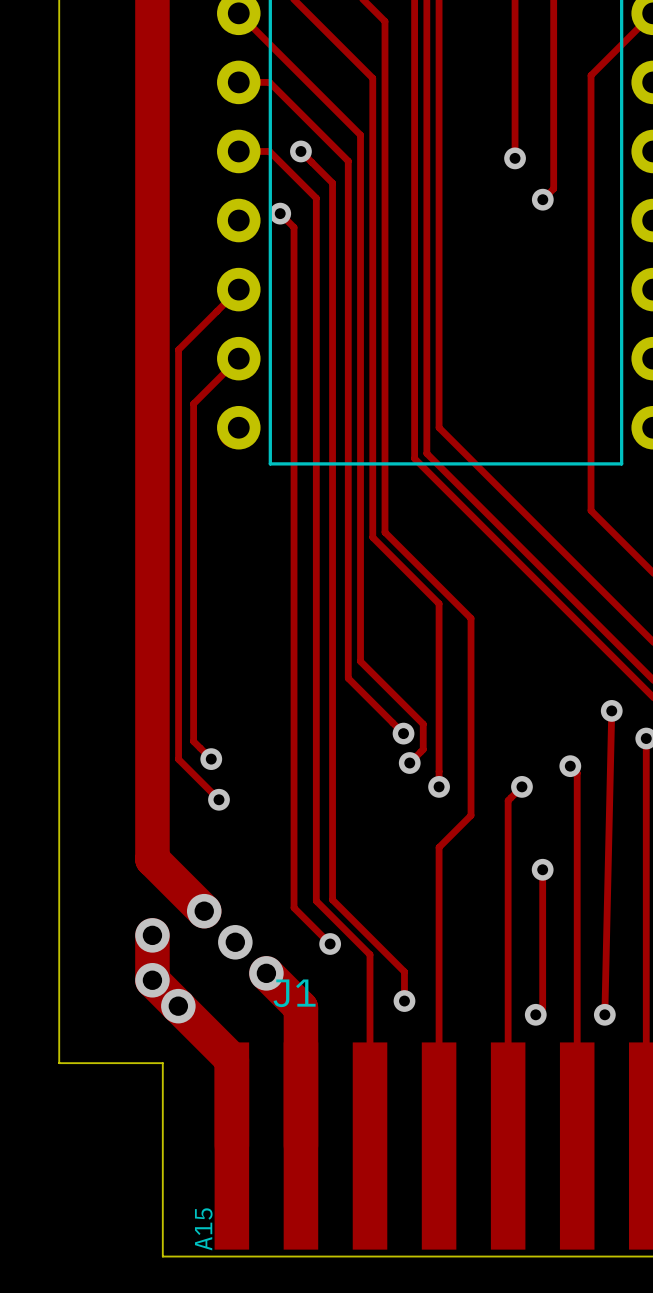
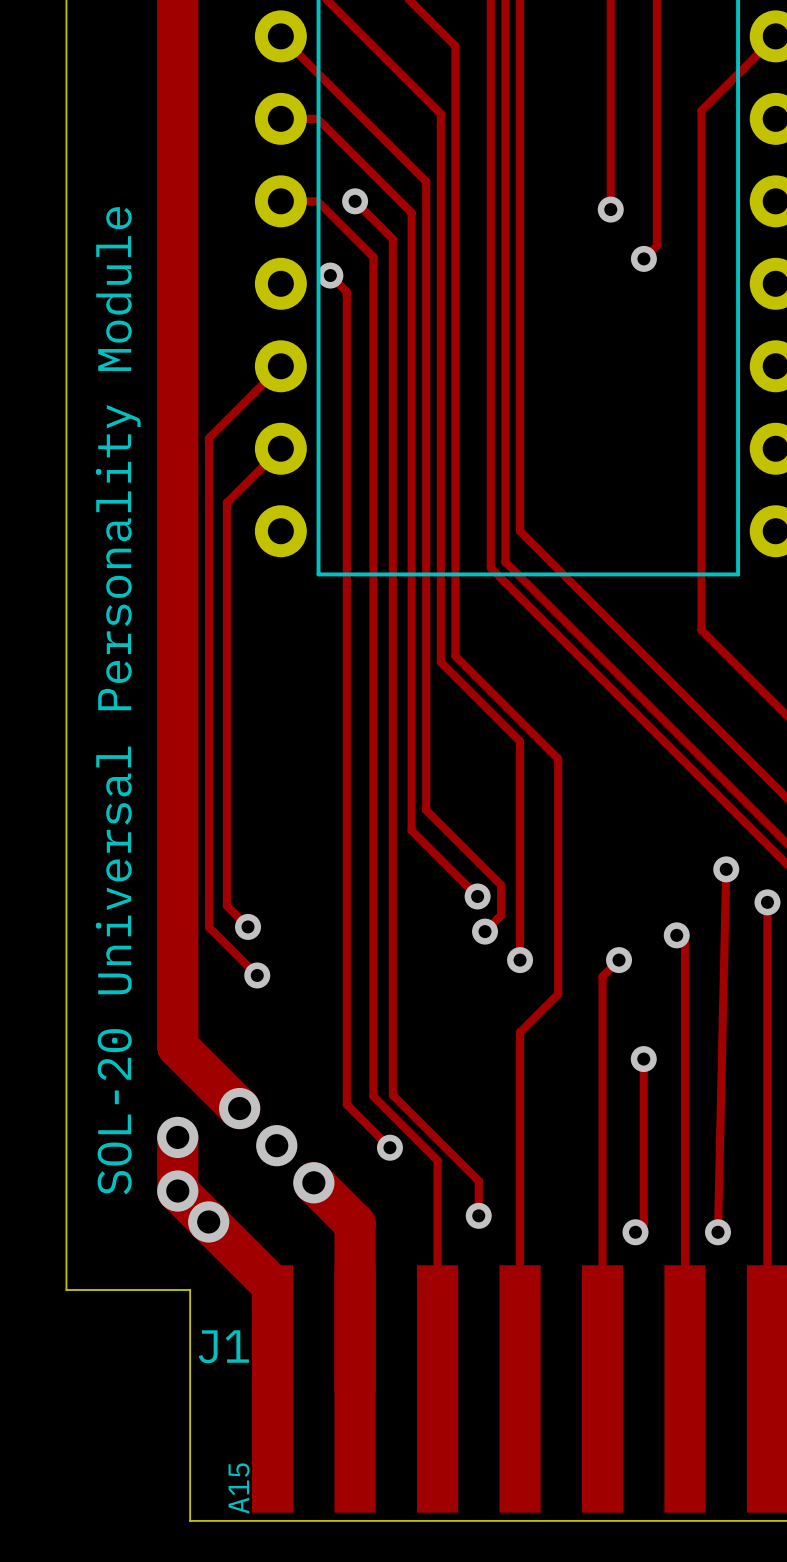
text: none -> SOL-20 Universal Personality Module (118, 700)
J1 name position: J1 (294, 993) -> J1 (223, 1346)

